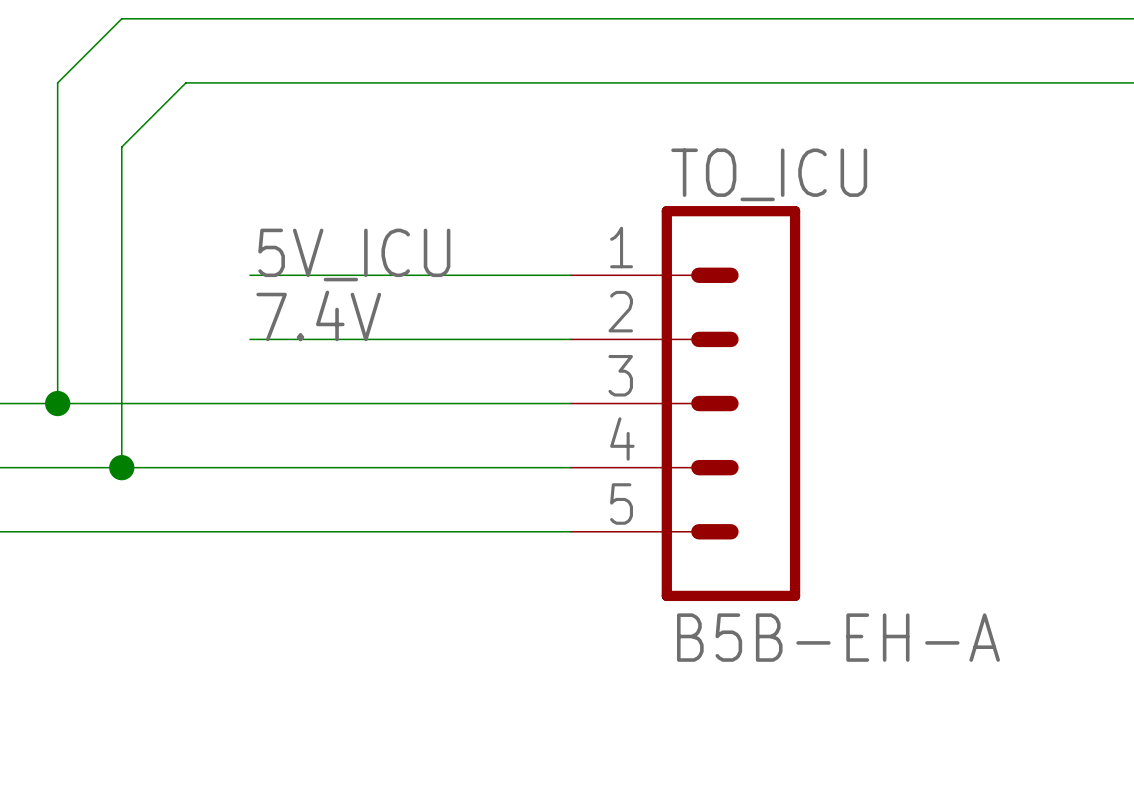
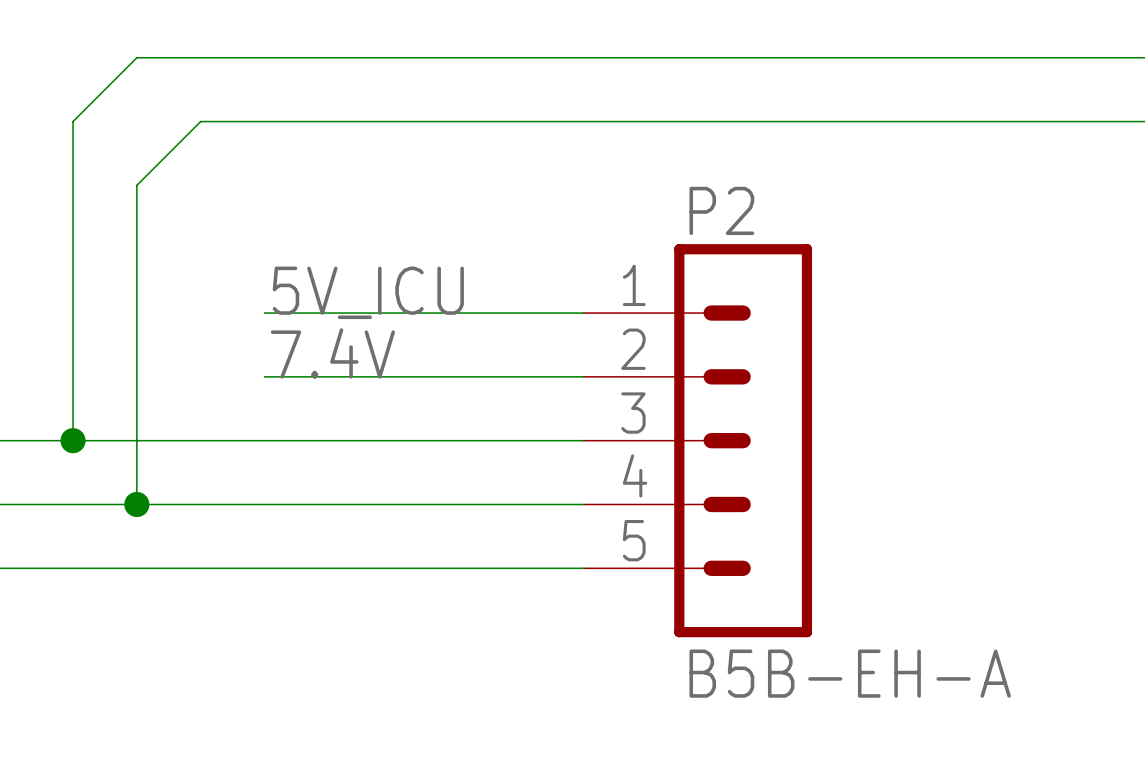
TO_ICU name: TO_ICU (769, 174) -> P2 (721, 210)

